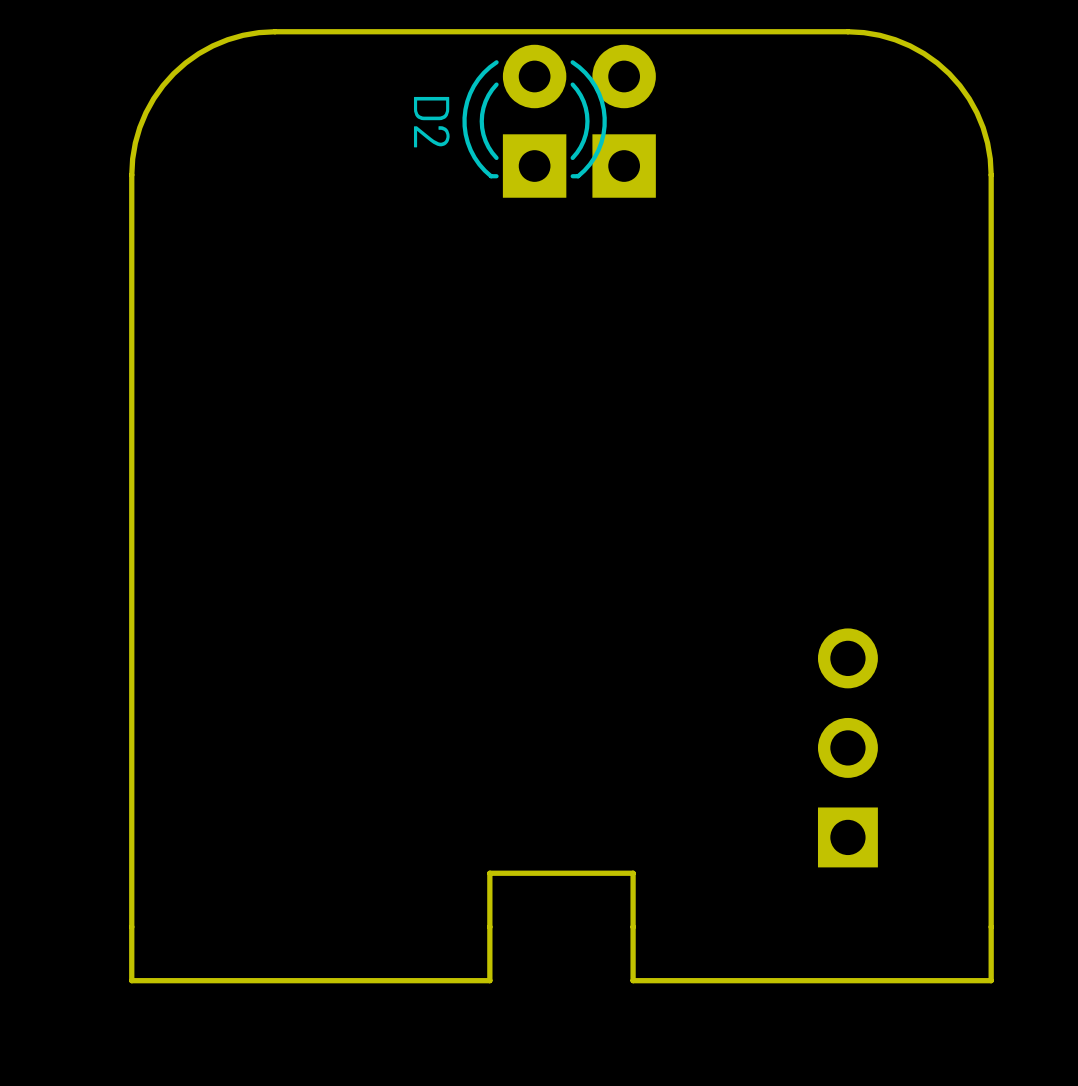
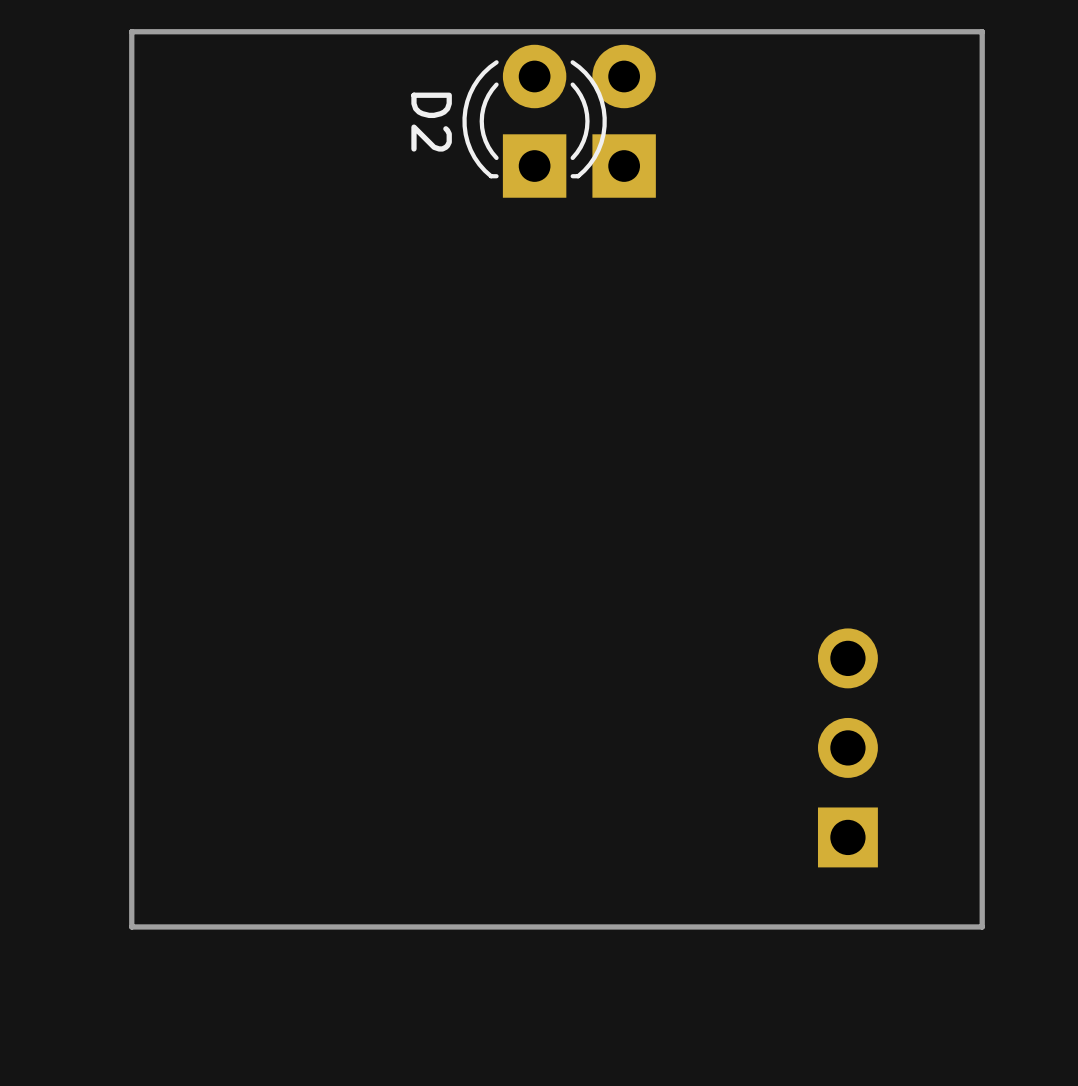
board edge: (274, 31) (243, 35) (227, 39) (198, 53) (173, 73) (153, 98) (139, 127) (132, 158) (131, 174) -> (274, 31) (131, 31) (131, 174)
board edge: (847, 31) (879, 35) (895, 39) (924, 53) (937, 62) (959, 85) (969, 98) (983, 127) (990, 158) (991, 980) (633, 980) (633, 873) (489, 873) (489, 980) (131, 980) (131, 926) -> (847, 31) (982, 31) (982, 926) (131, 926)

